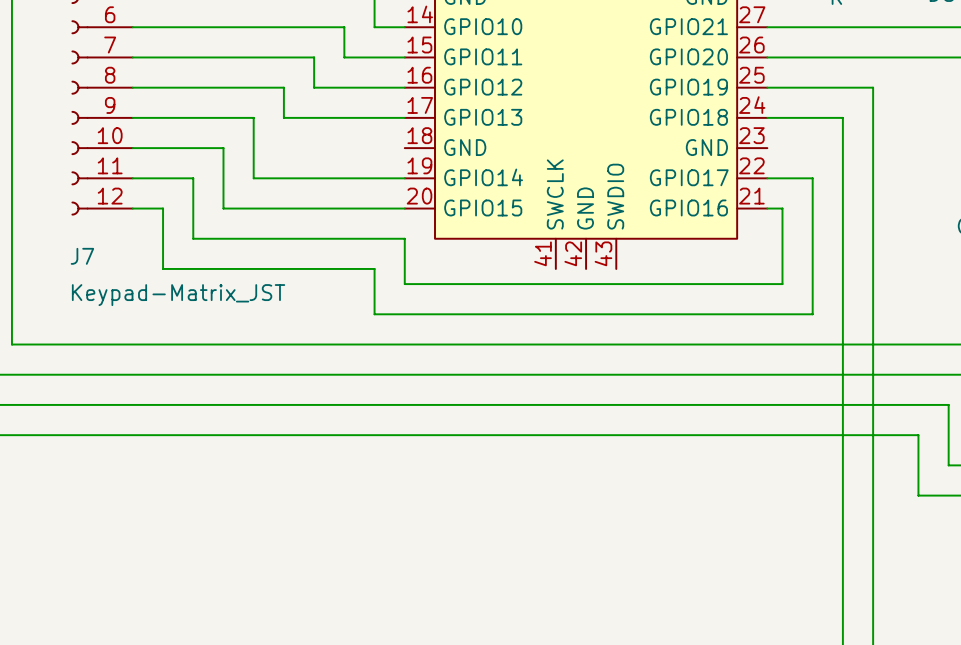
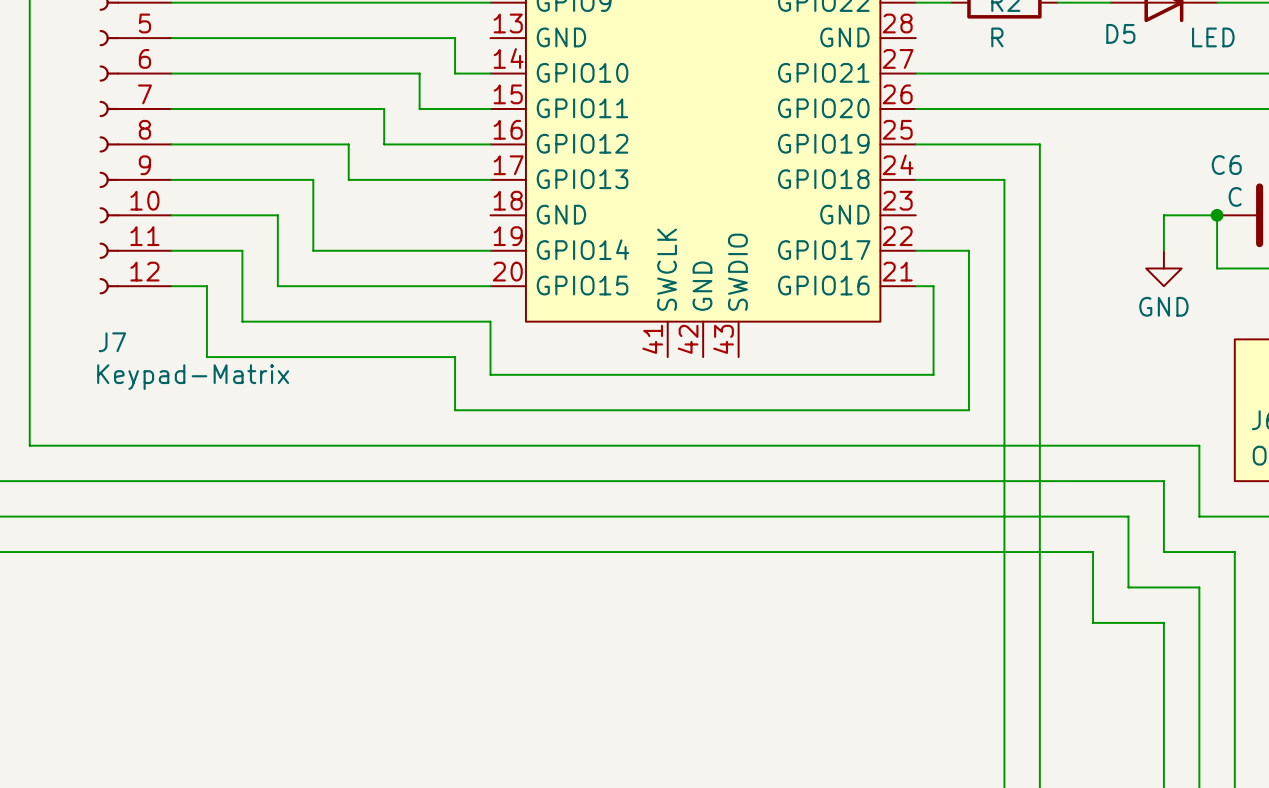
J7 value: Keypad-Matrix_JST (178, 295) -> Keypad-Matrix (193, 377)

